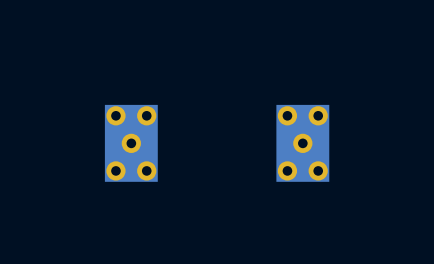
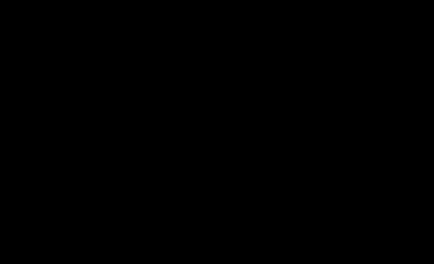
part: (131, 143) -> none
part: (302, 143) -> none

